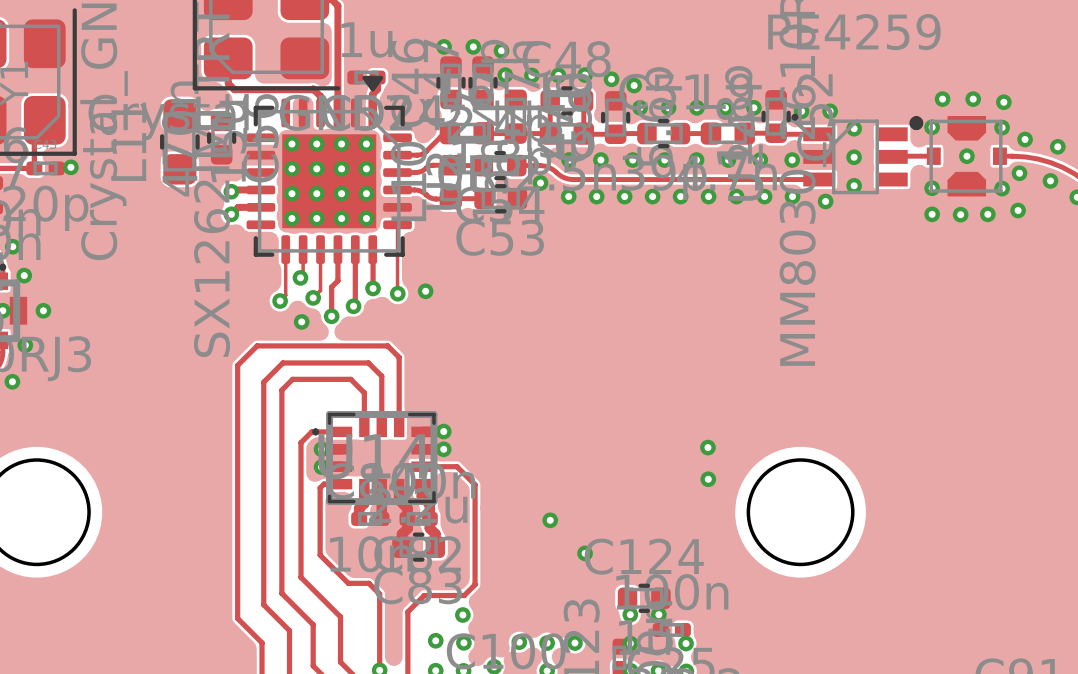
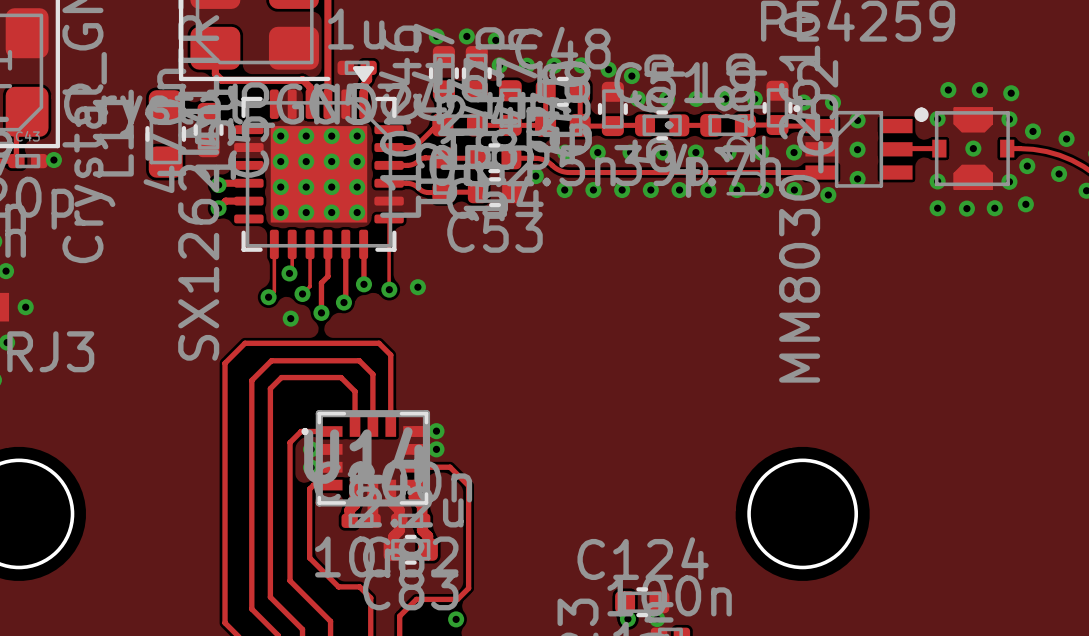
via: (707, 447) -> none
via: (708, 479) -> none
via: (550, 520) -> none
via: (585, 553) -> none

